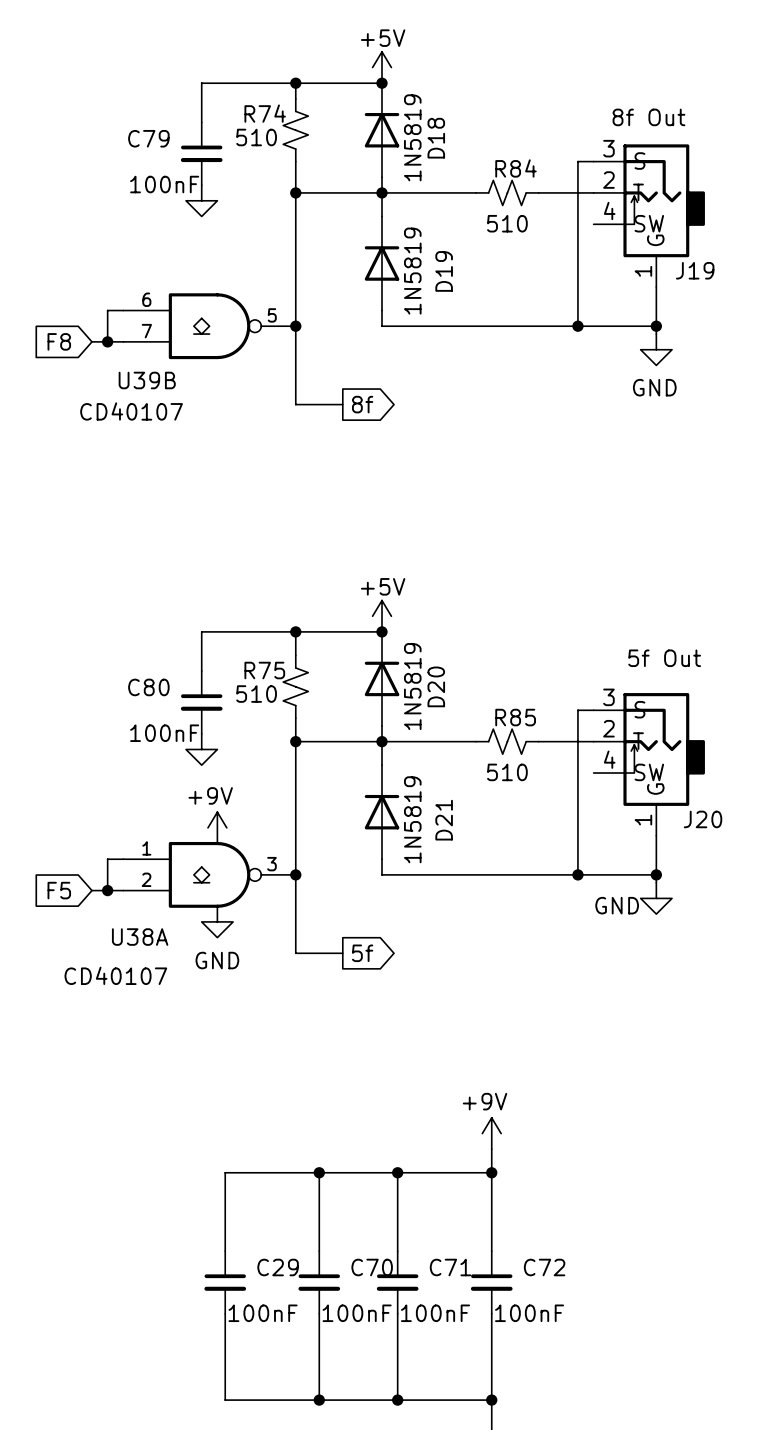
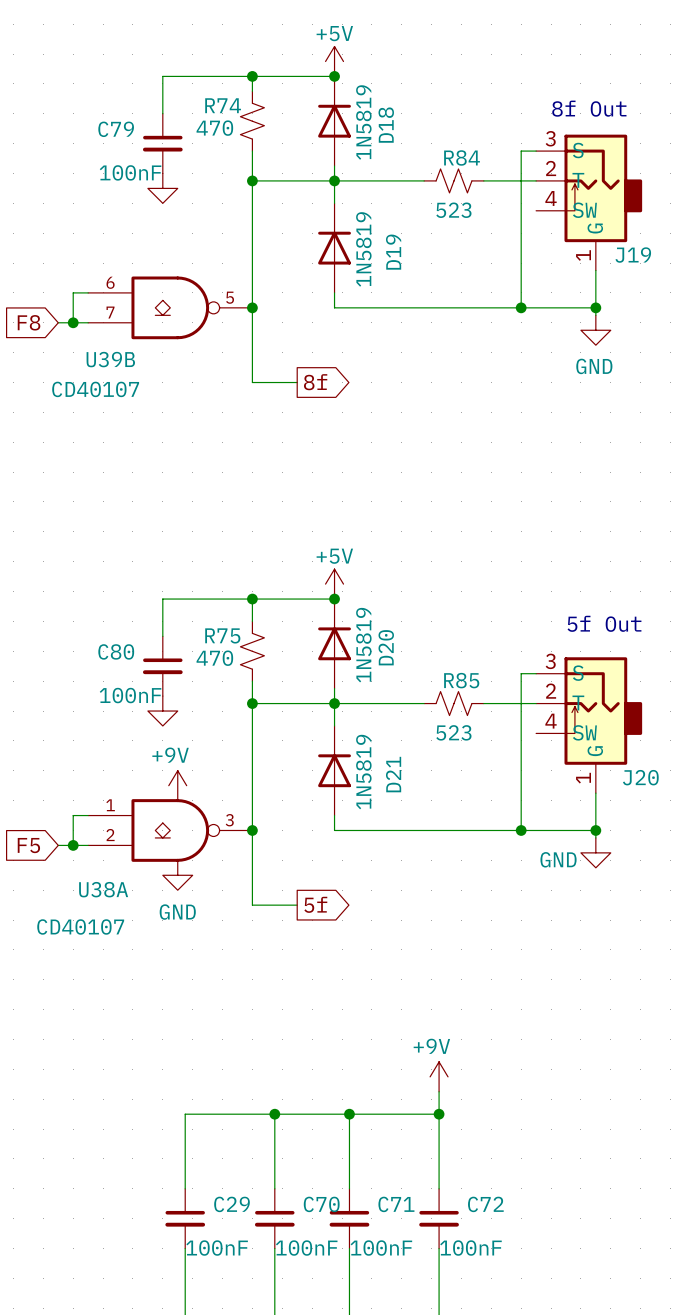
R74 value: 510 (256, 137) -> 470 (214, 128)
R84 value: 510 (507, 223) -> 523 (453, 210)
R75 value: 510 (256, 694) -> 470 (214, 658)
R85 value: 510 (507, 772) -> 523 (453, 732)

